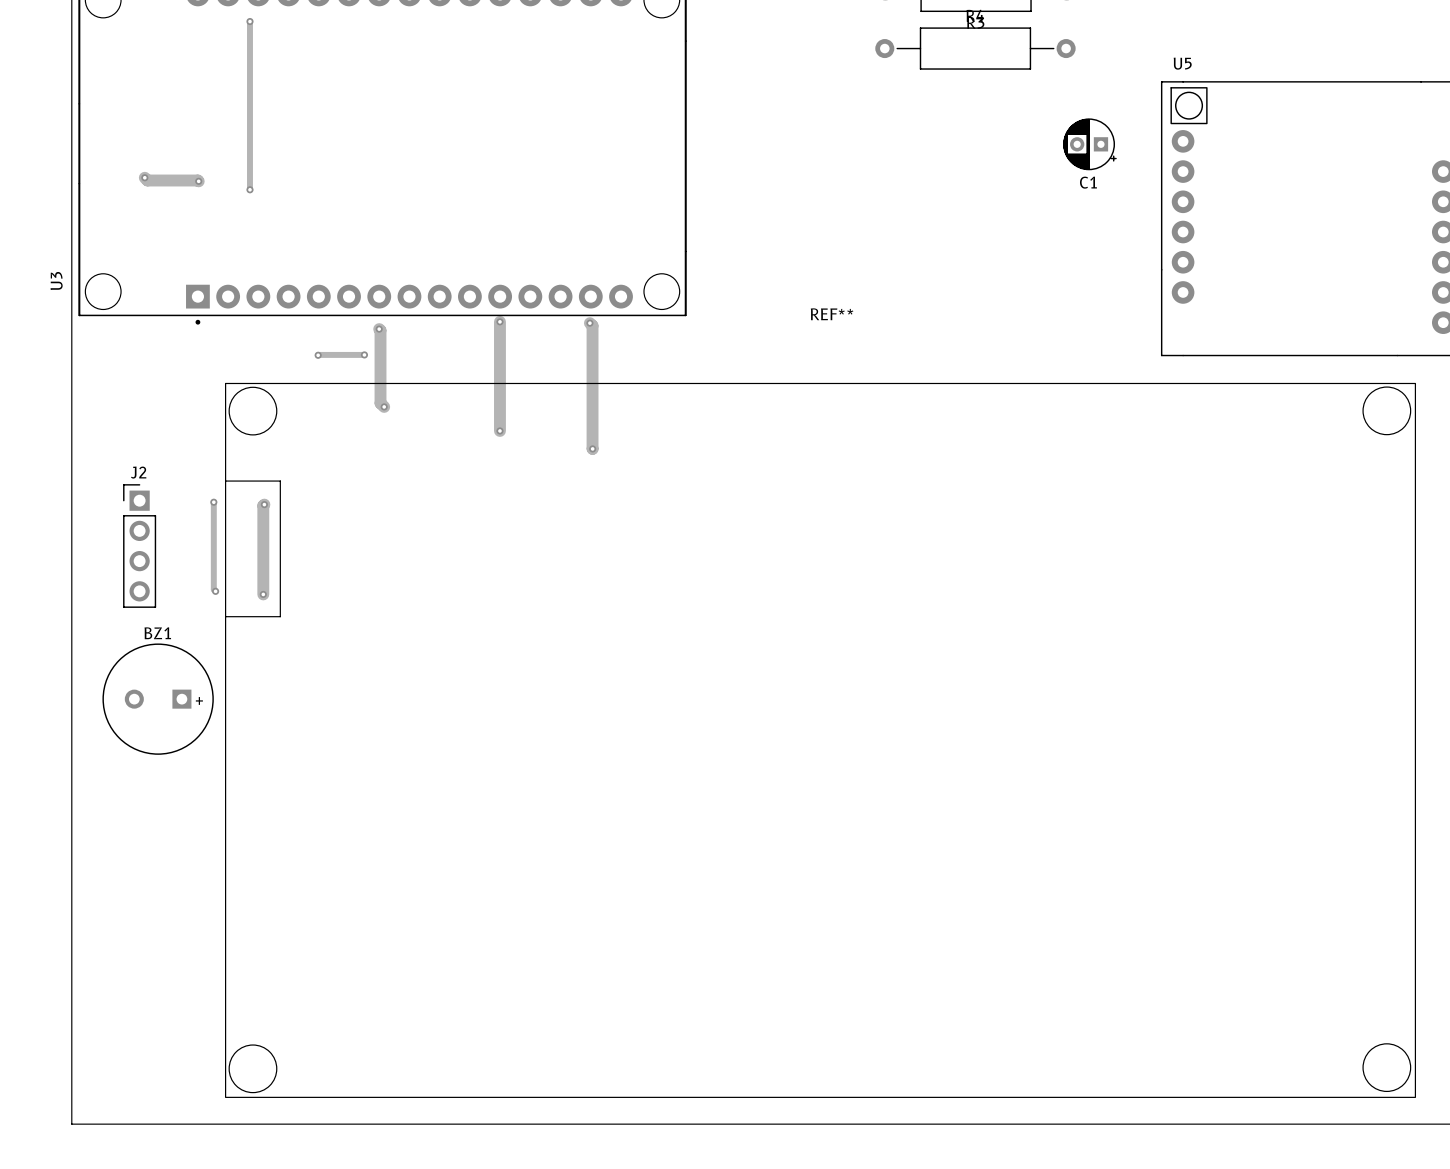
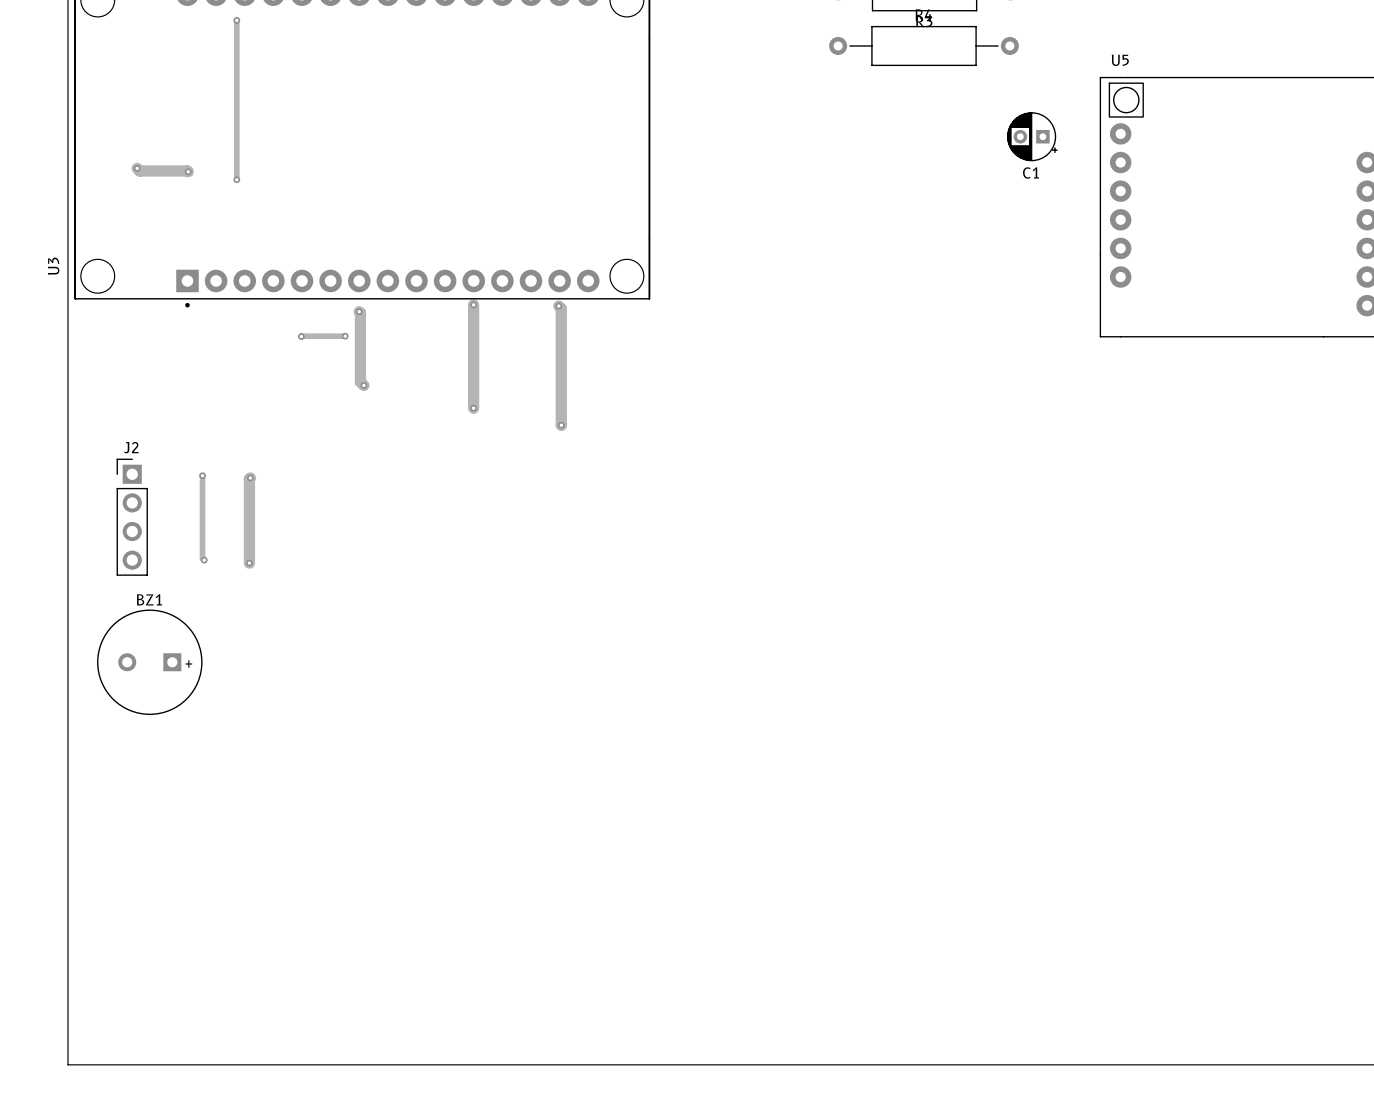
REF**: (820, 740) -> none

